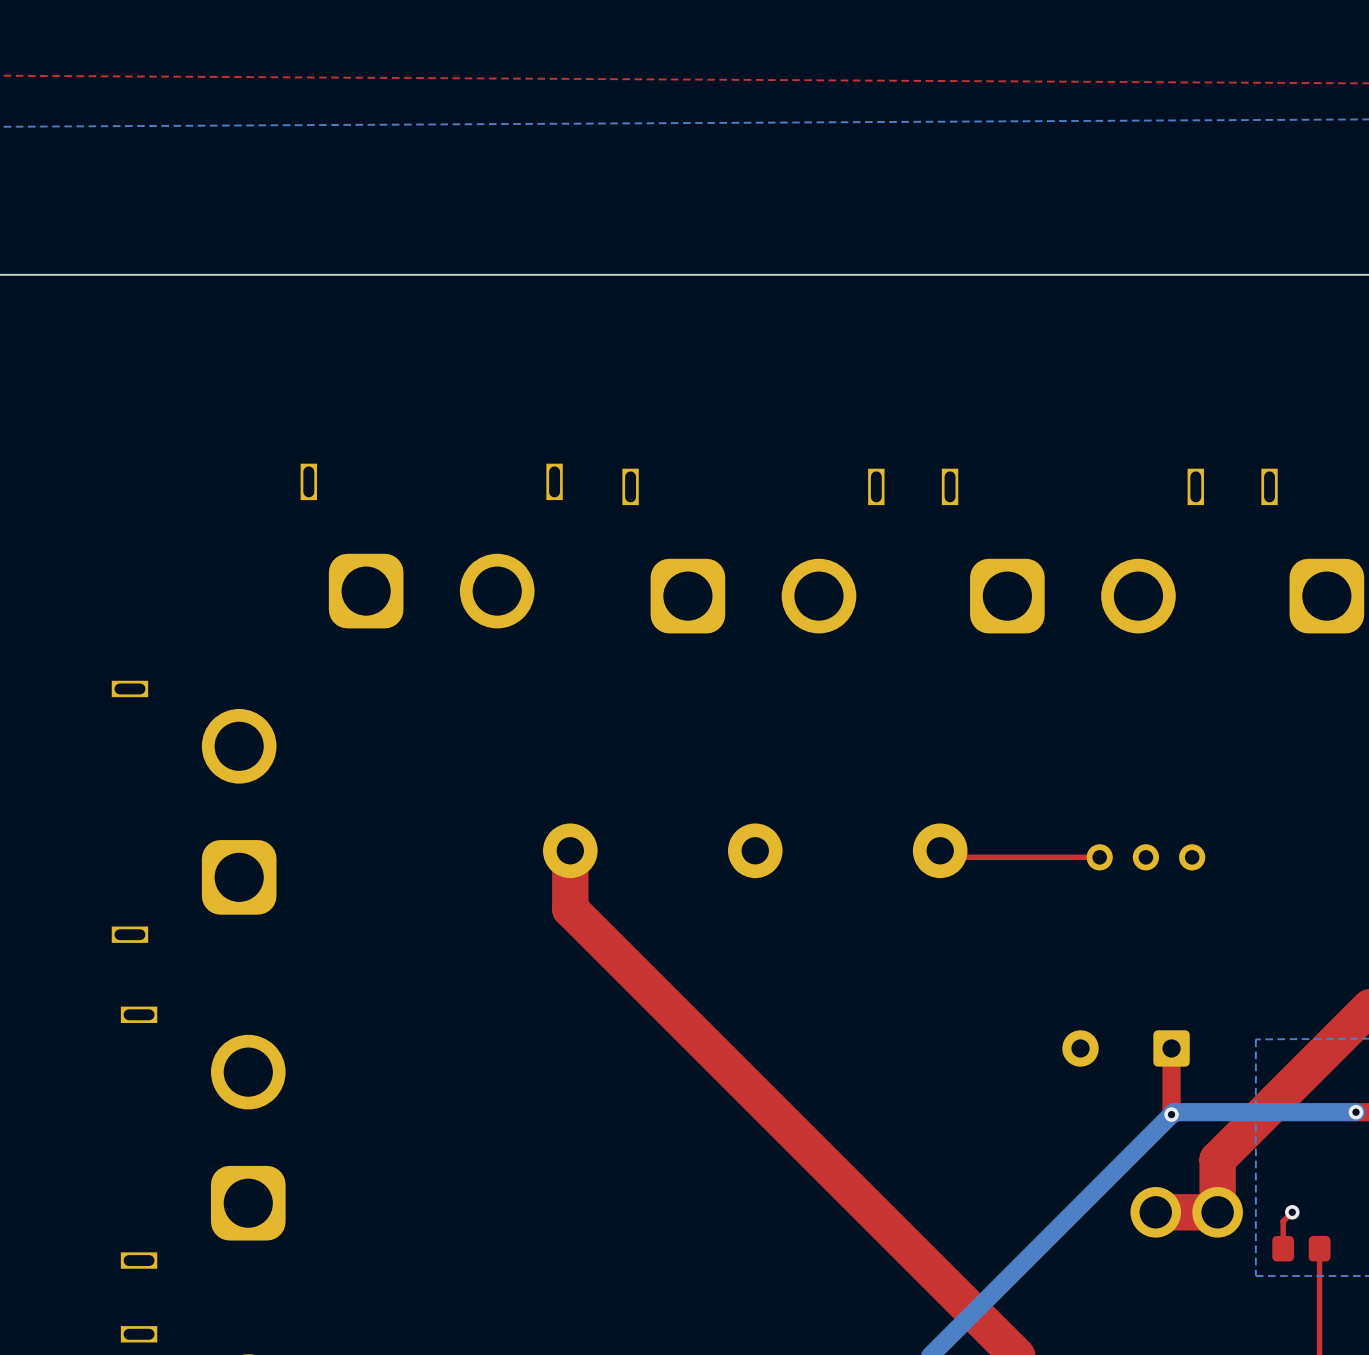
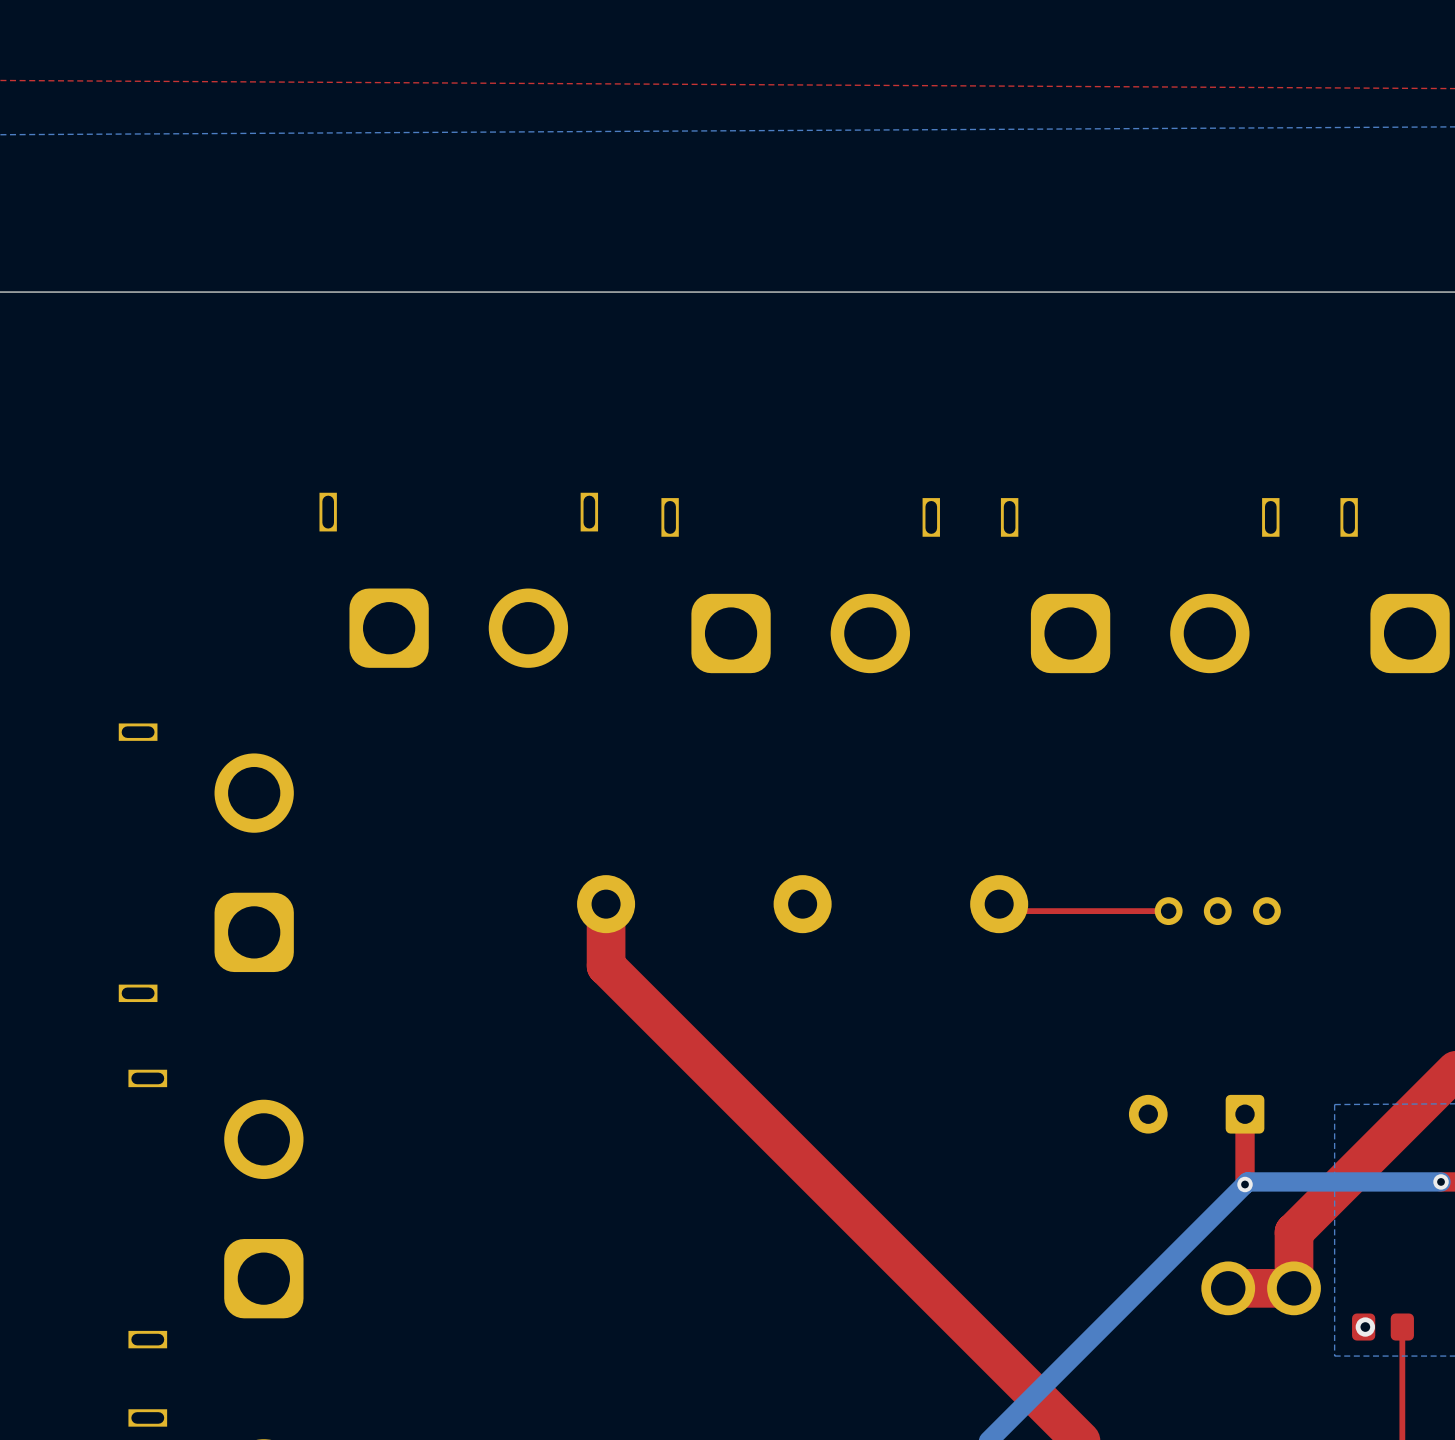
top track: (1292, 1212) (1283, 1221) (1283, 1248) -> none
via: (1292, 1212) -> none
via: none -> (1365, 1327)

